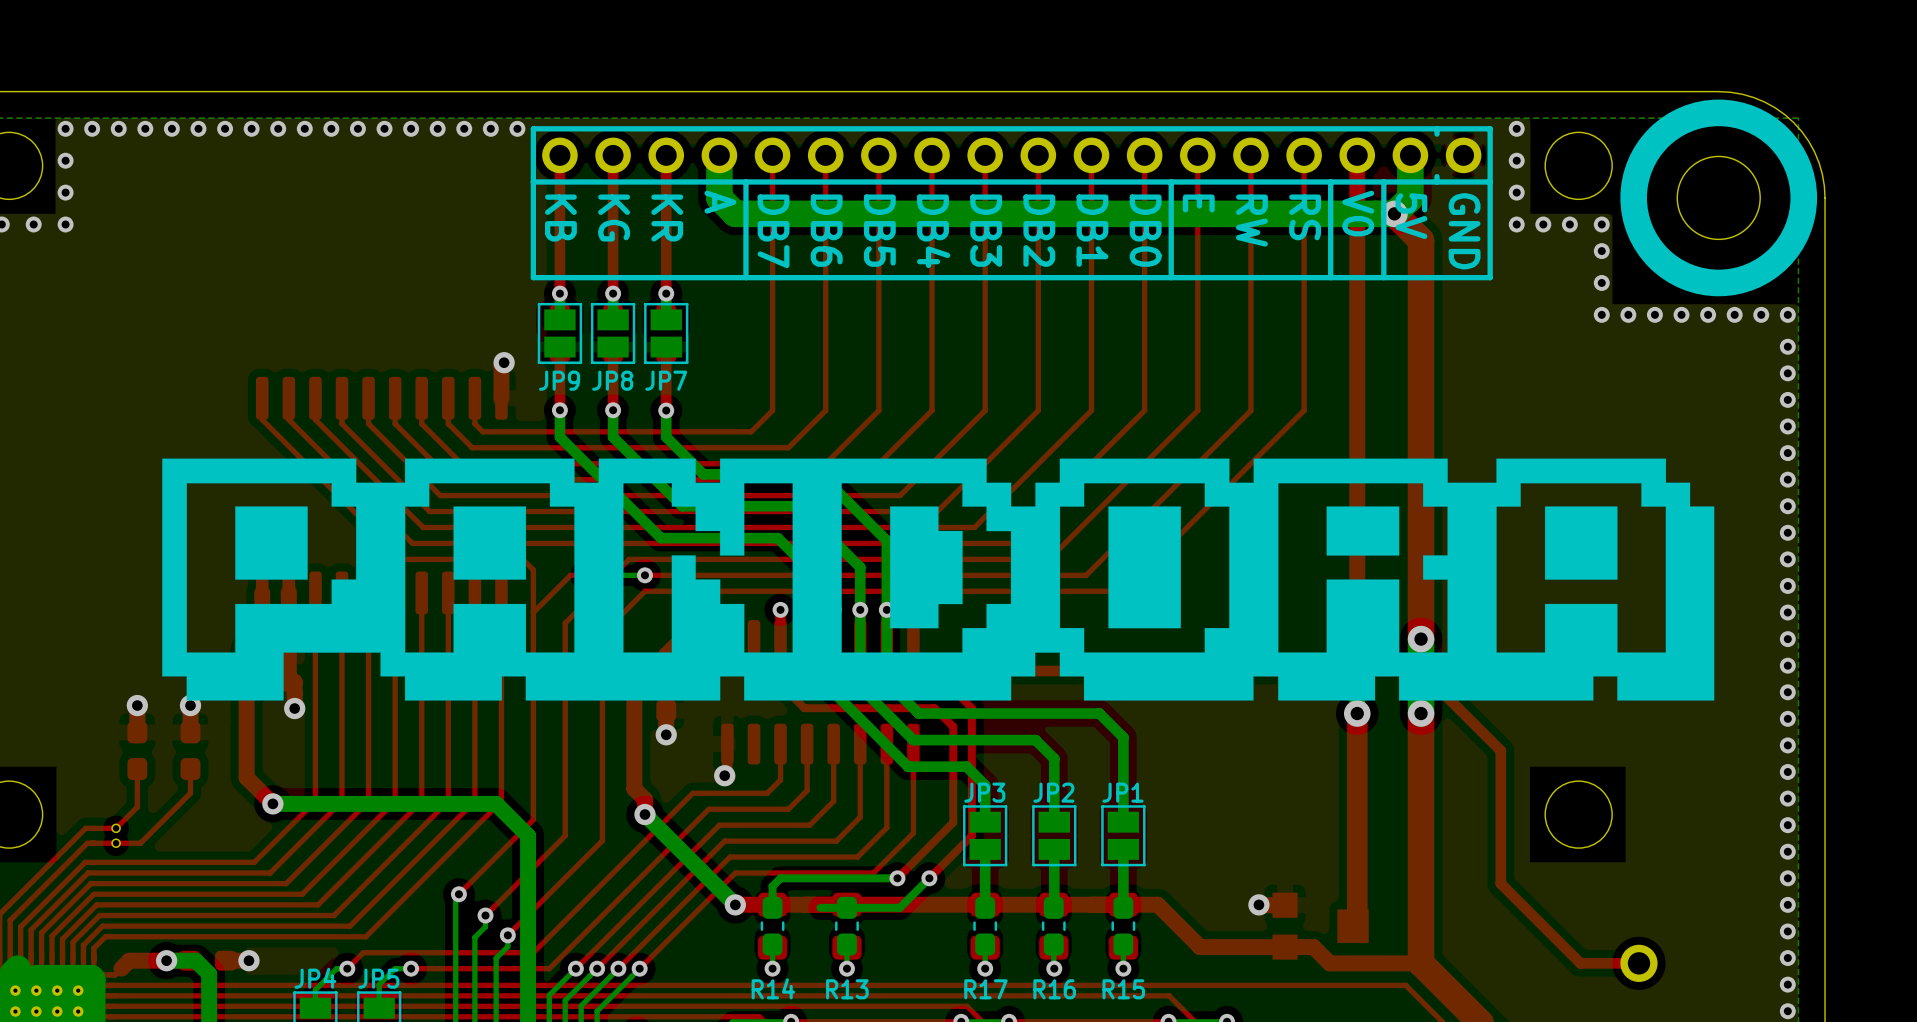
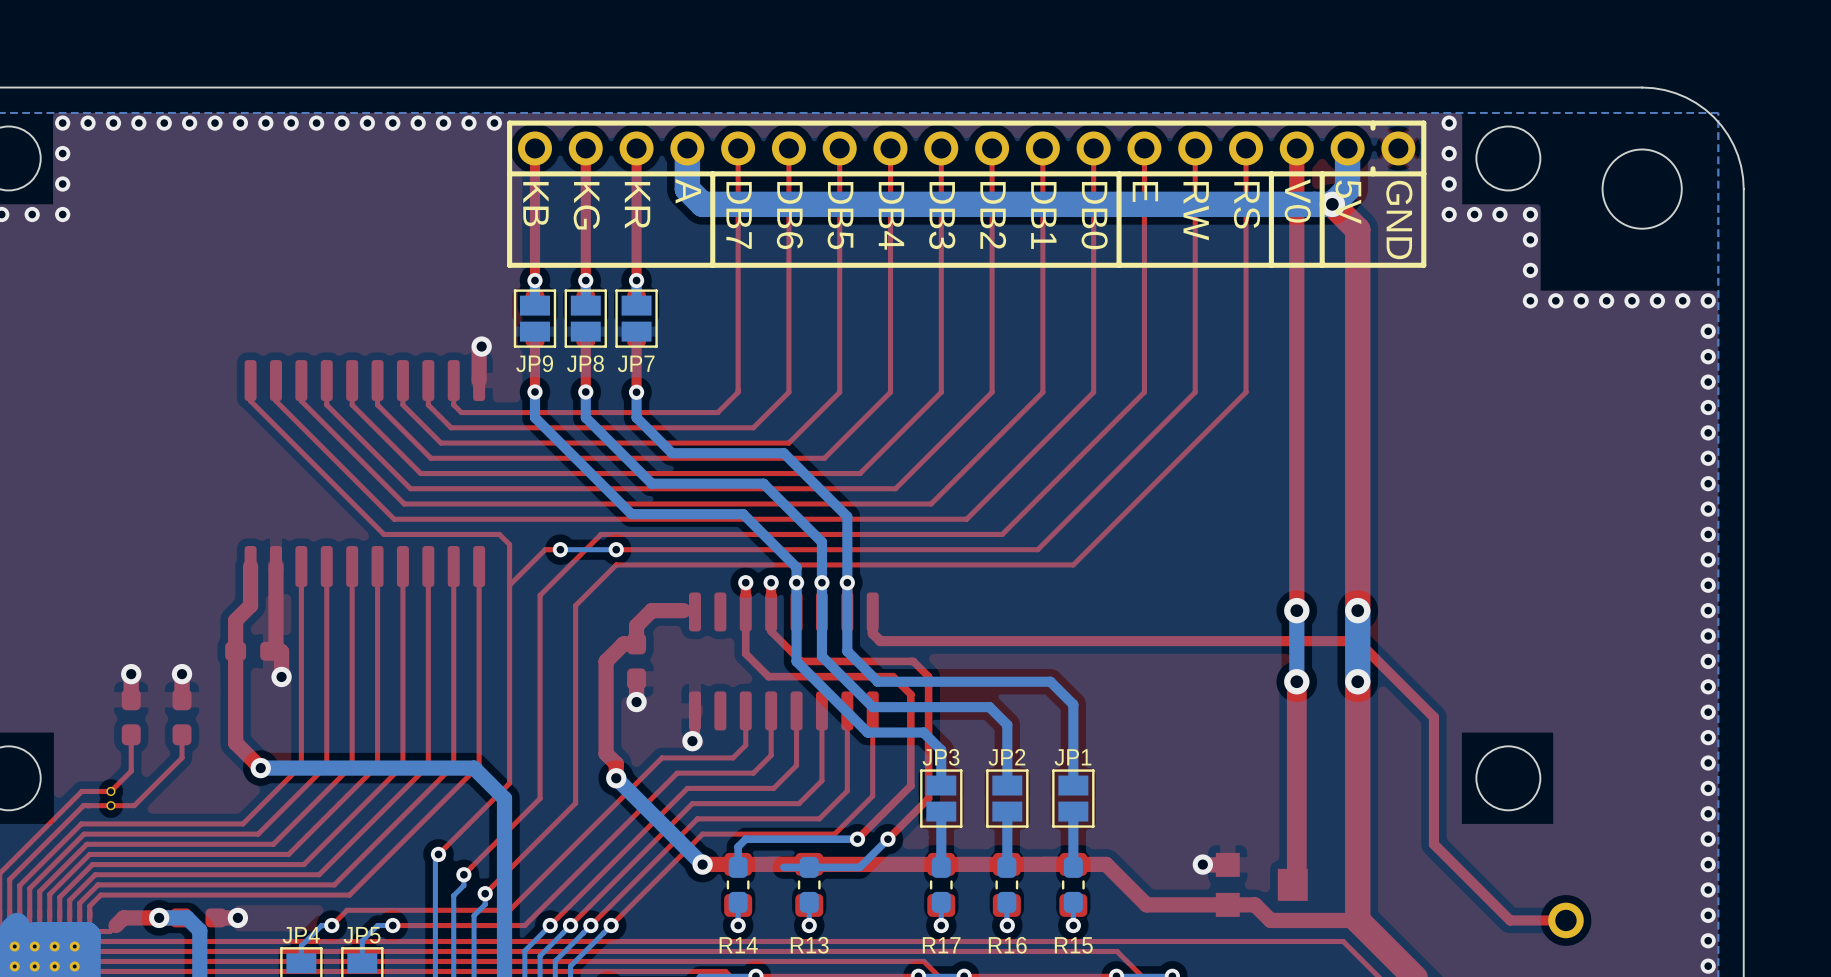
drawing: [1620, 99, 1818, 297] -> none
drawing: [162, 458, 1715, 701] -> none

